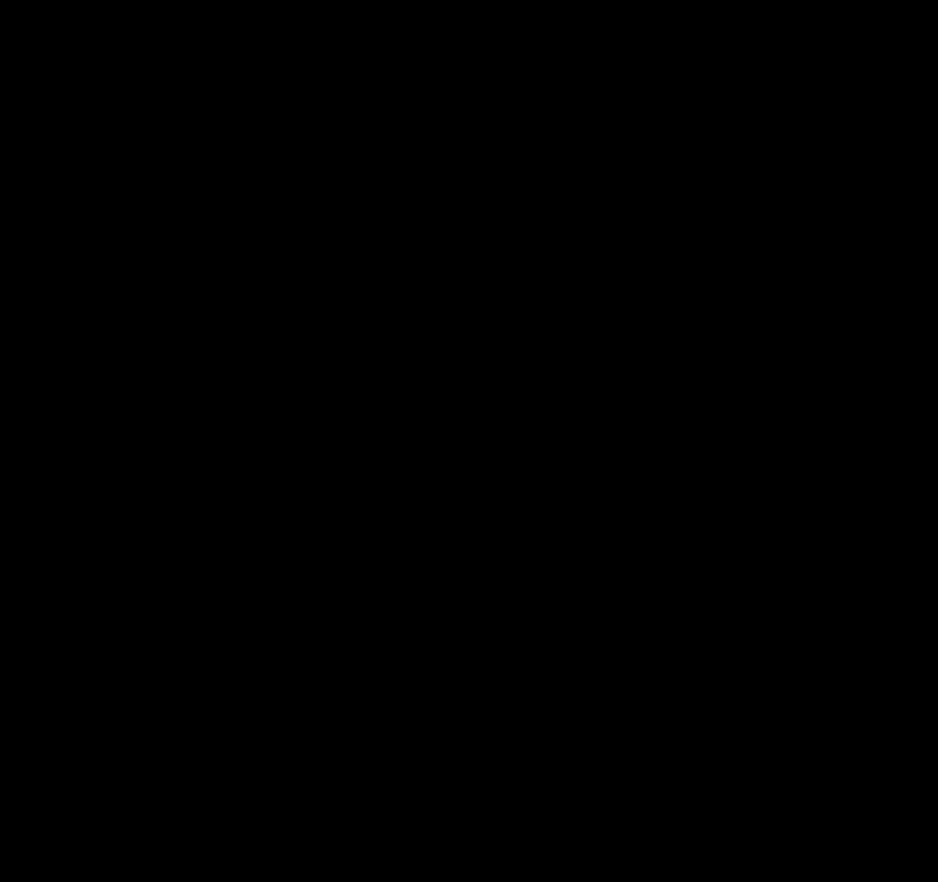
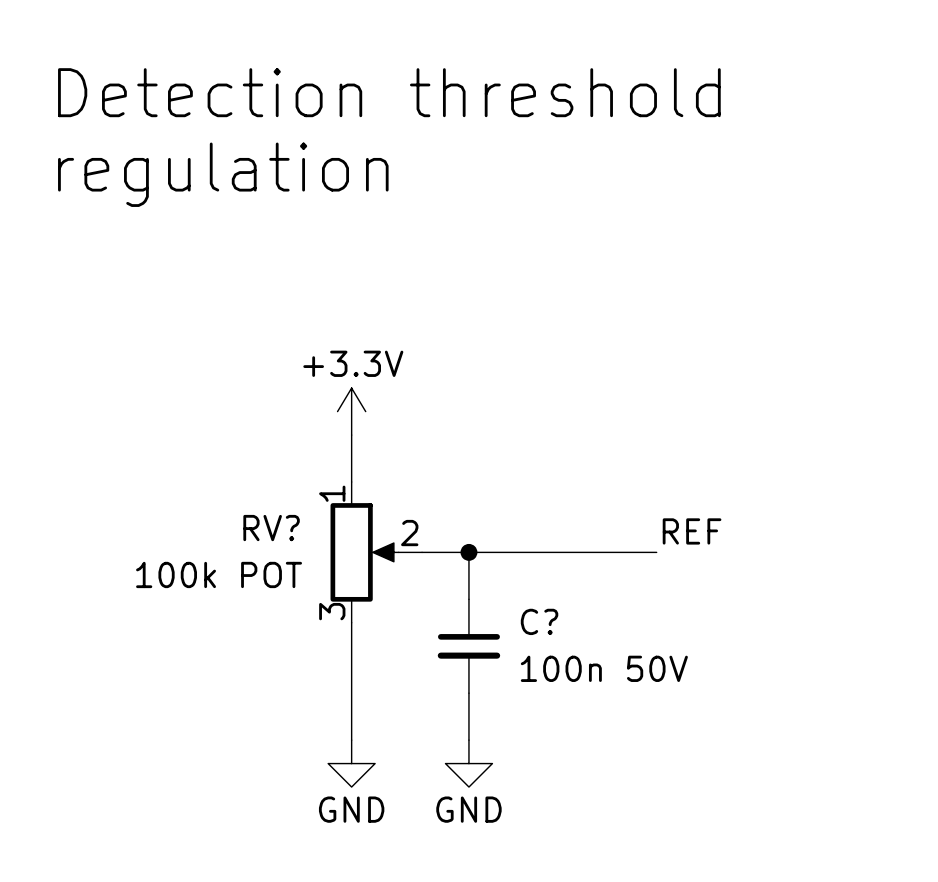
text: none -> Detection threshold (389, 92)
text: none -> regulation (223, 174)
power symbol: none -> +3.3V (351, 411)
wire: none -> (351, 435) (351, 481)
label: none -> REF (692, 531)
RV?: none -> 100k POT (376, 552)
wire: none -> (422, 552) (656, 552)
wire: none -> (468, 552) (468, 599)
junction: none -> (468, 552)
wire: none -> (351, 622) (351, 740)
C?: none -> 100n 50V (468, 646)
wire: none -> (468, 693) (468, 740)
power symbol: none -> GND (351, 763)
power symbol: none -> GND (468, 763)

